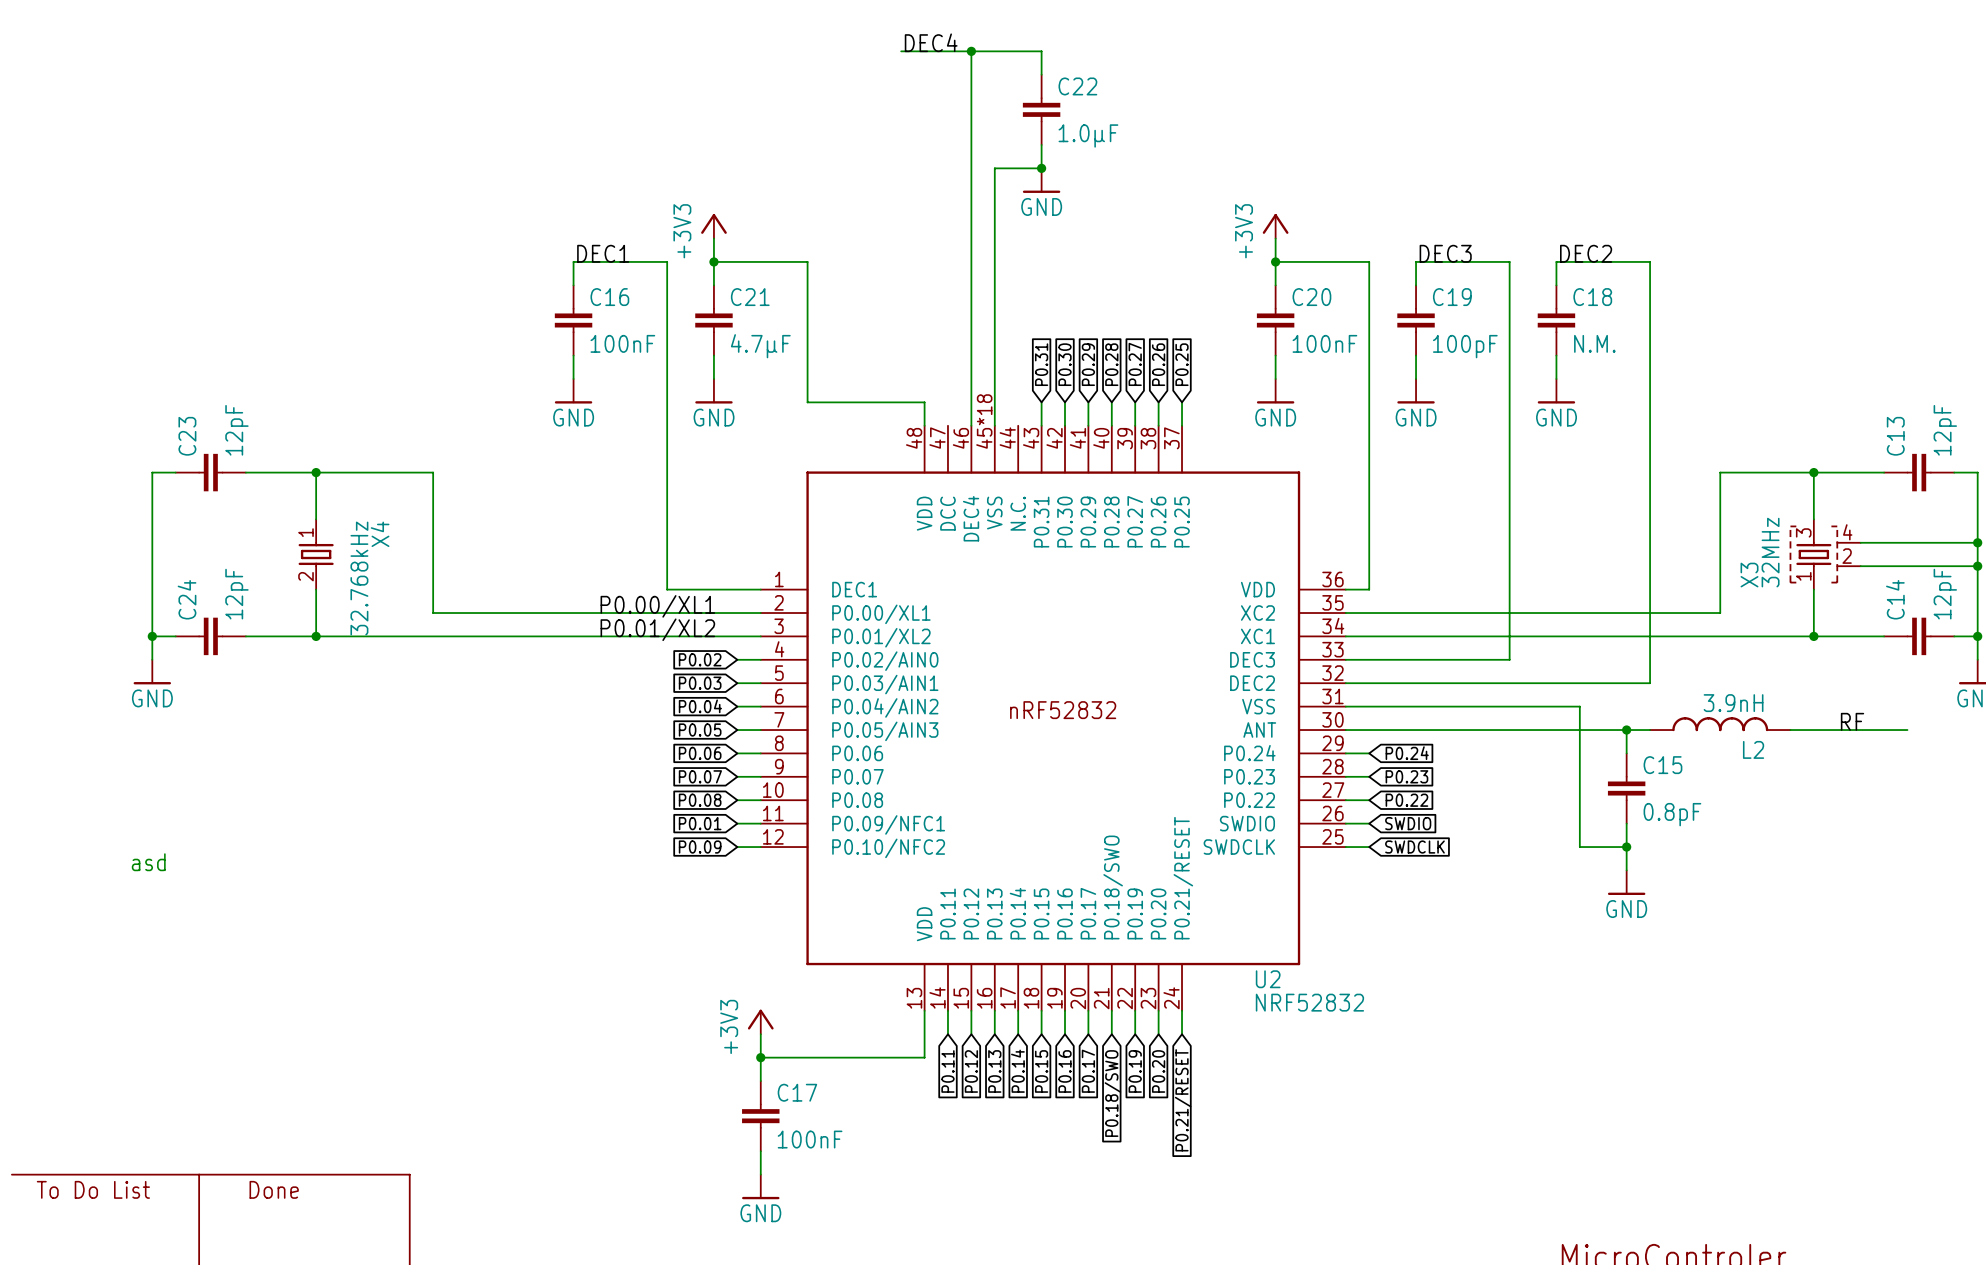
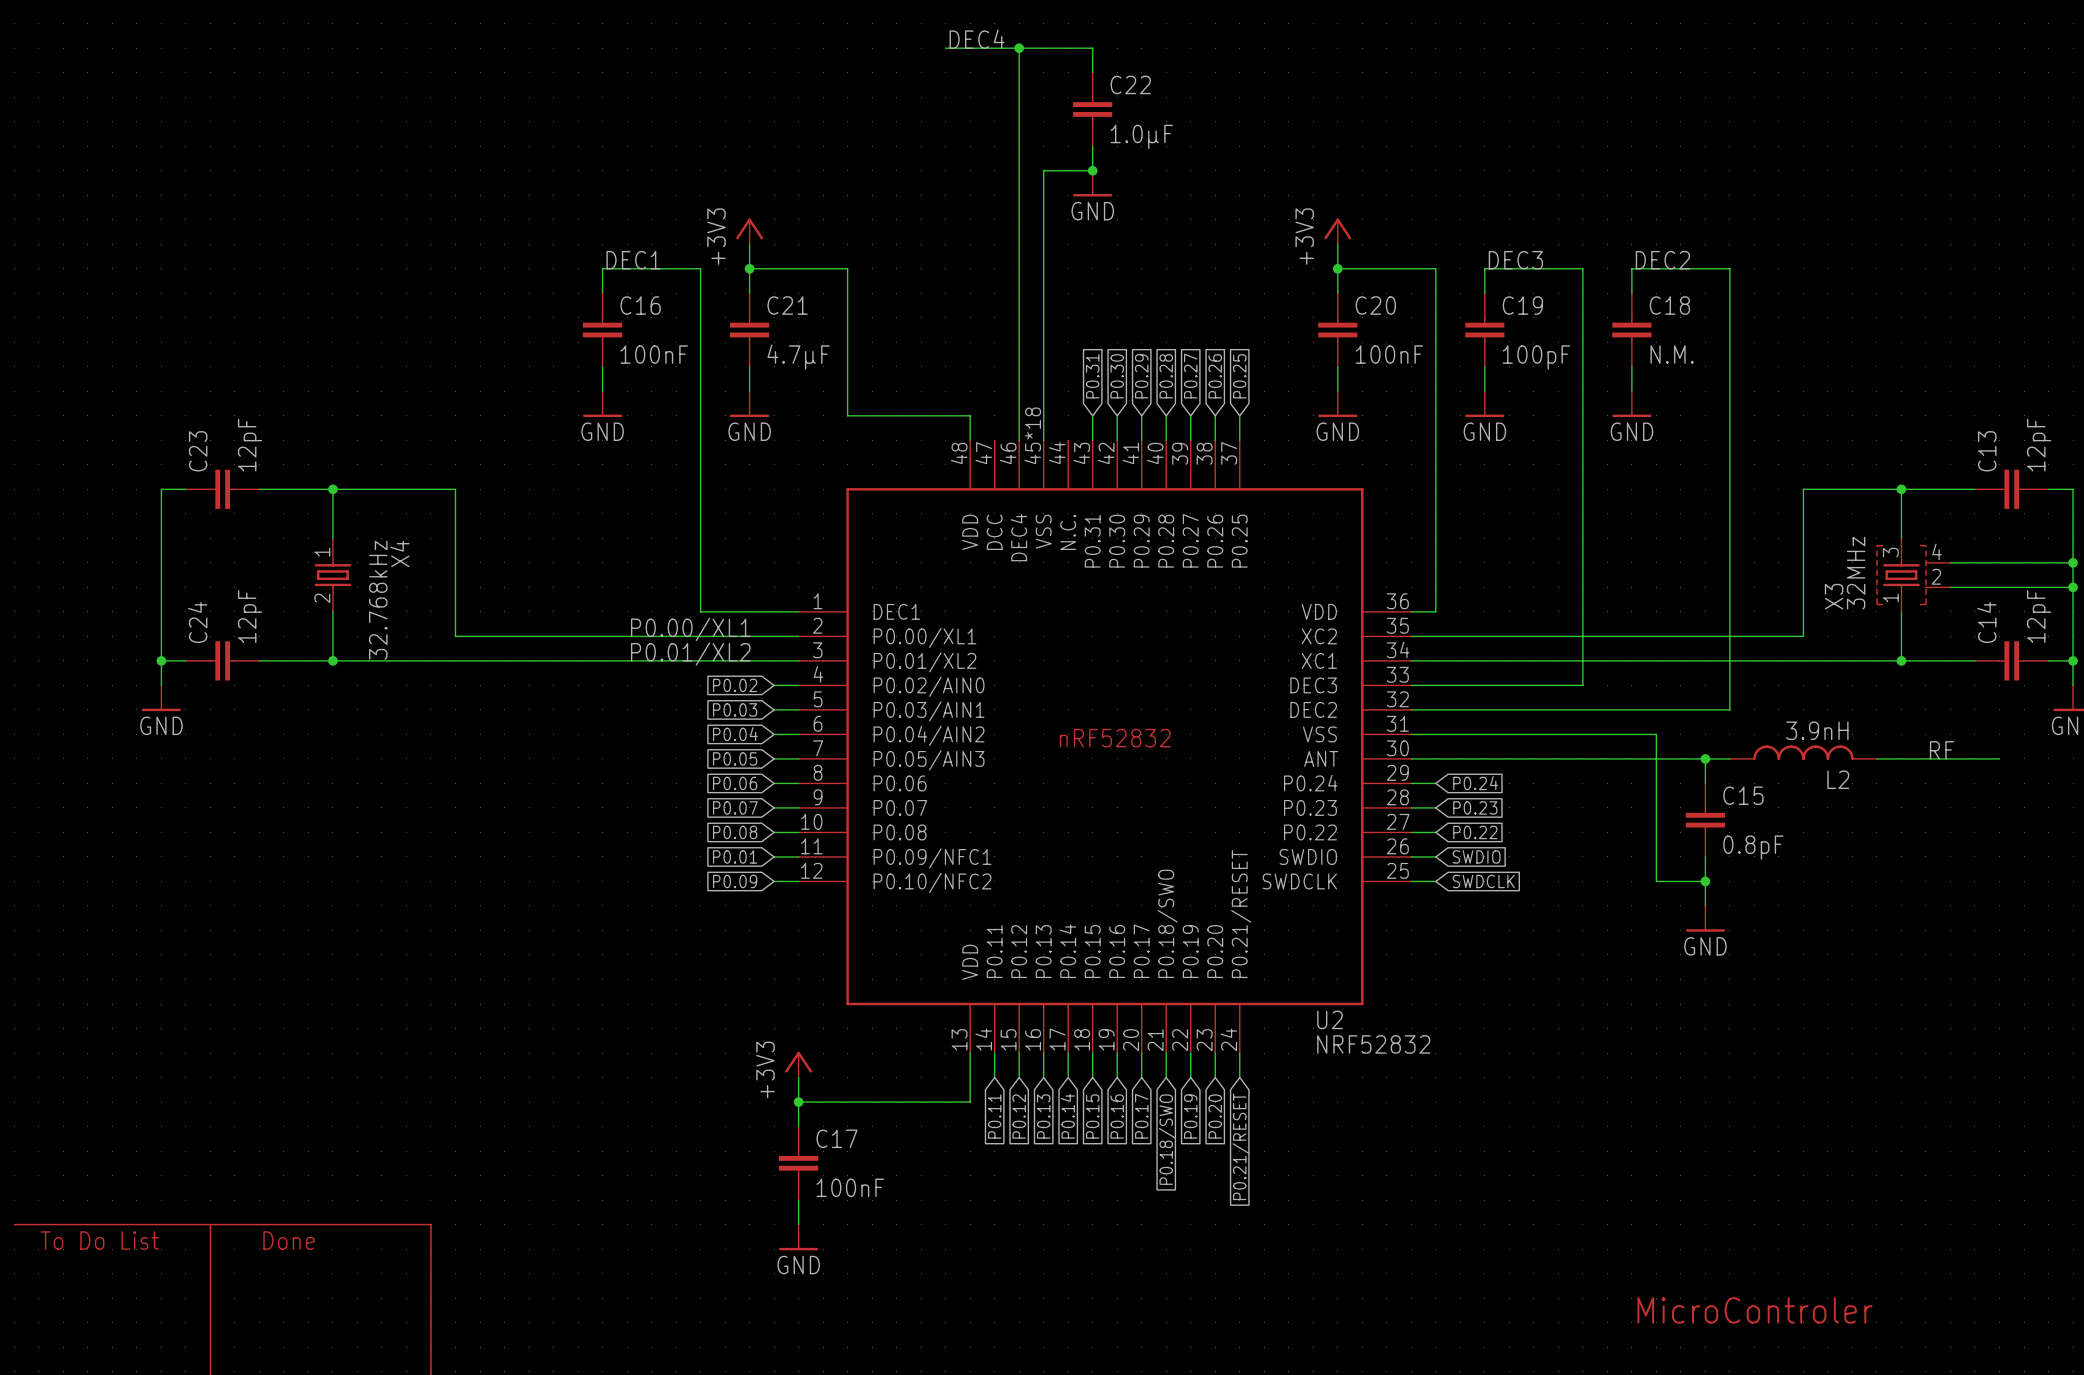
text: asd (148, 862) -> none

